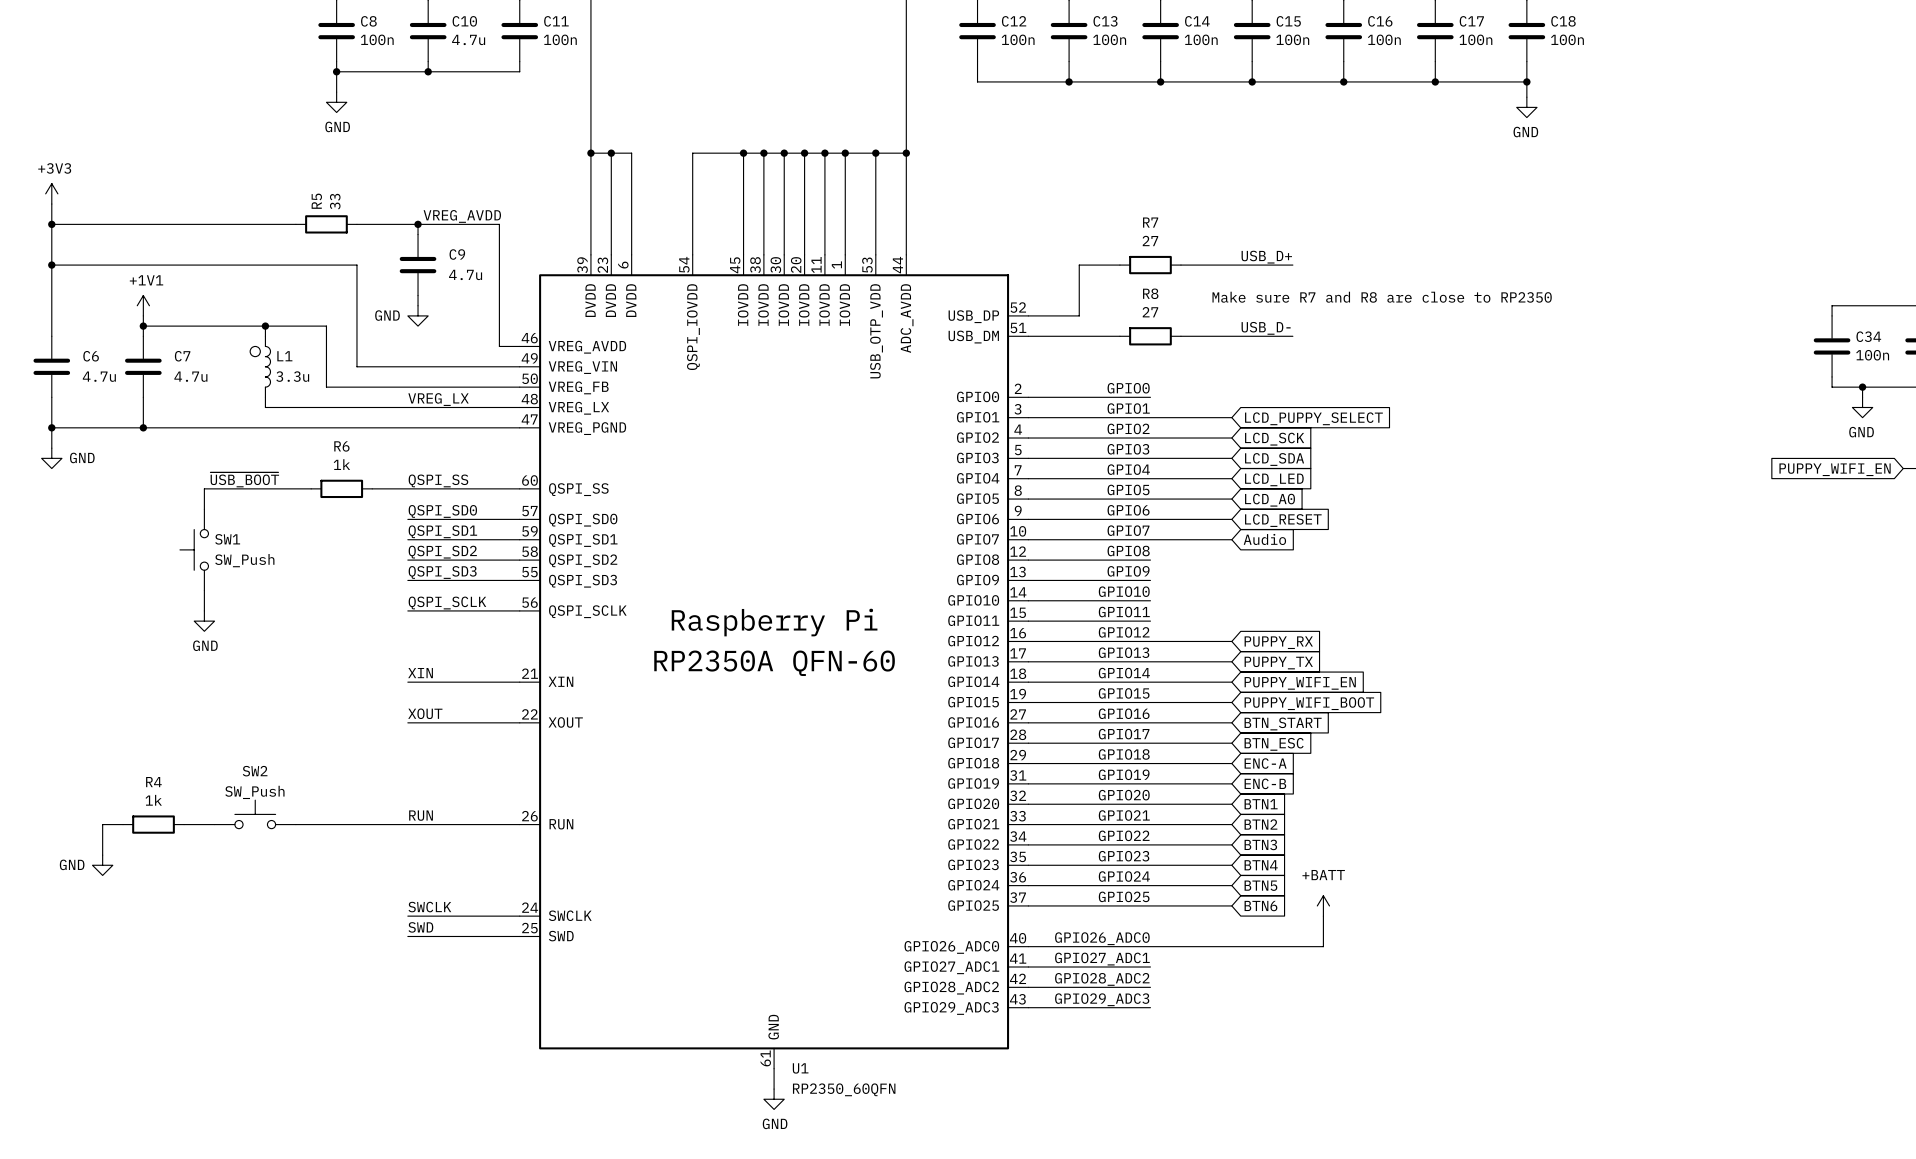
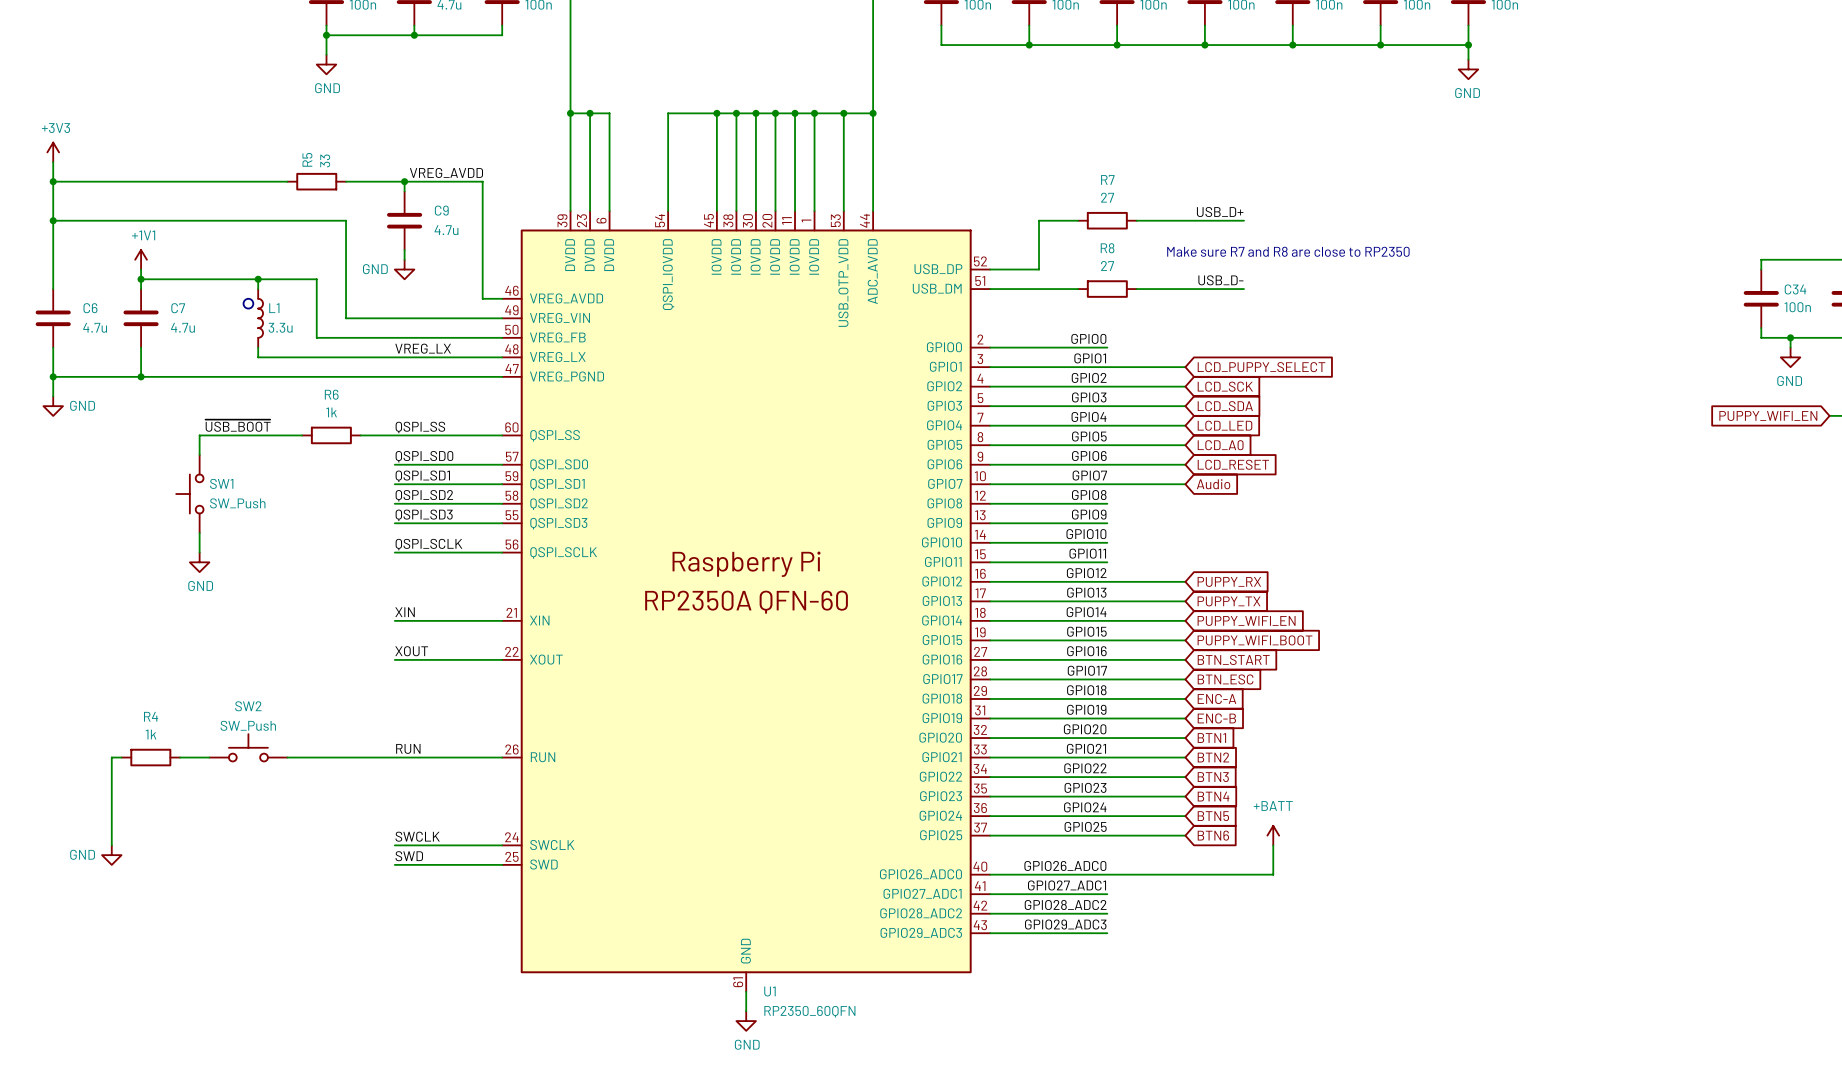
wire: (112, 824) (102, 824) (102, 855) -> (111, 757) (111, 845)
power symbol position: GND (102, 865) -> GND (111, 855)

